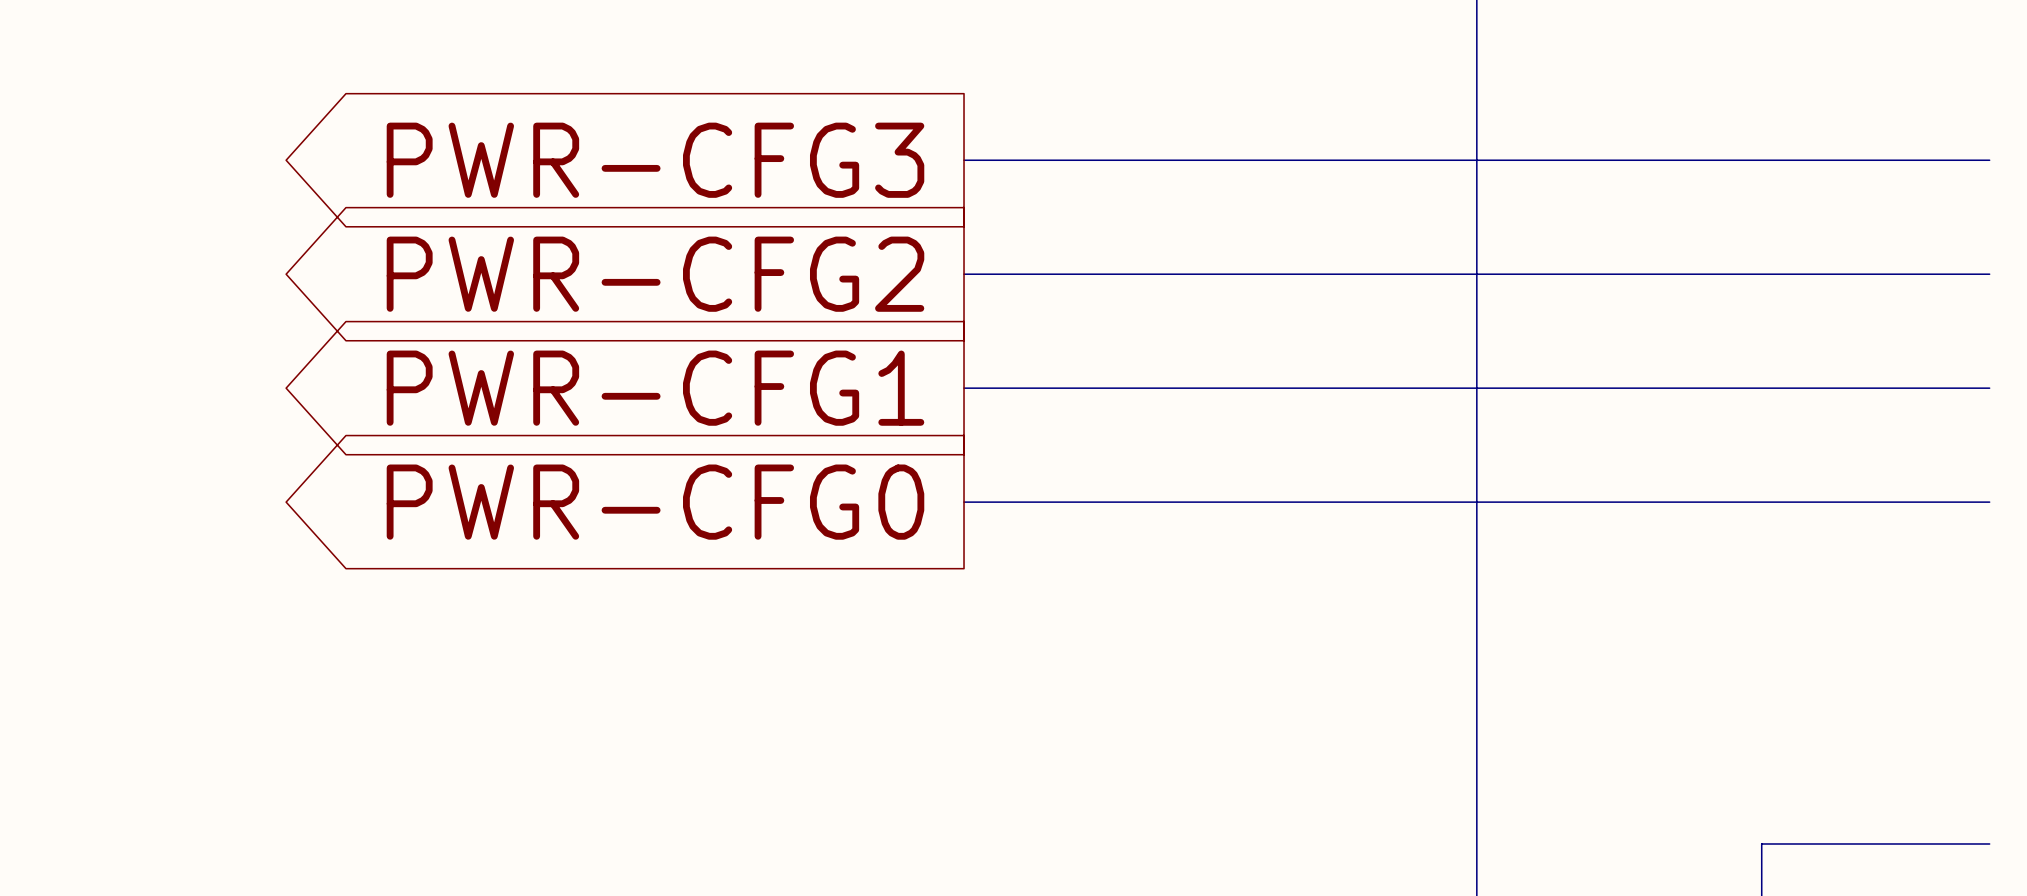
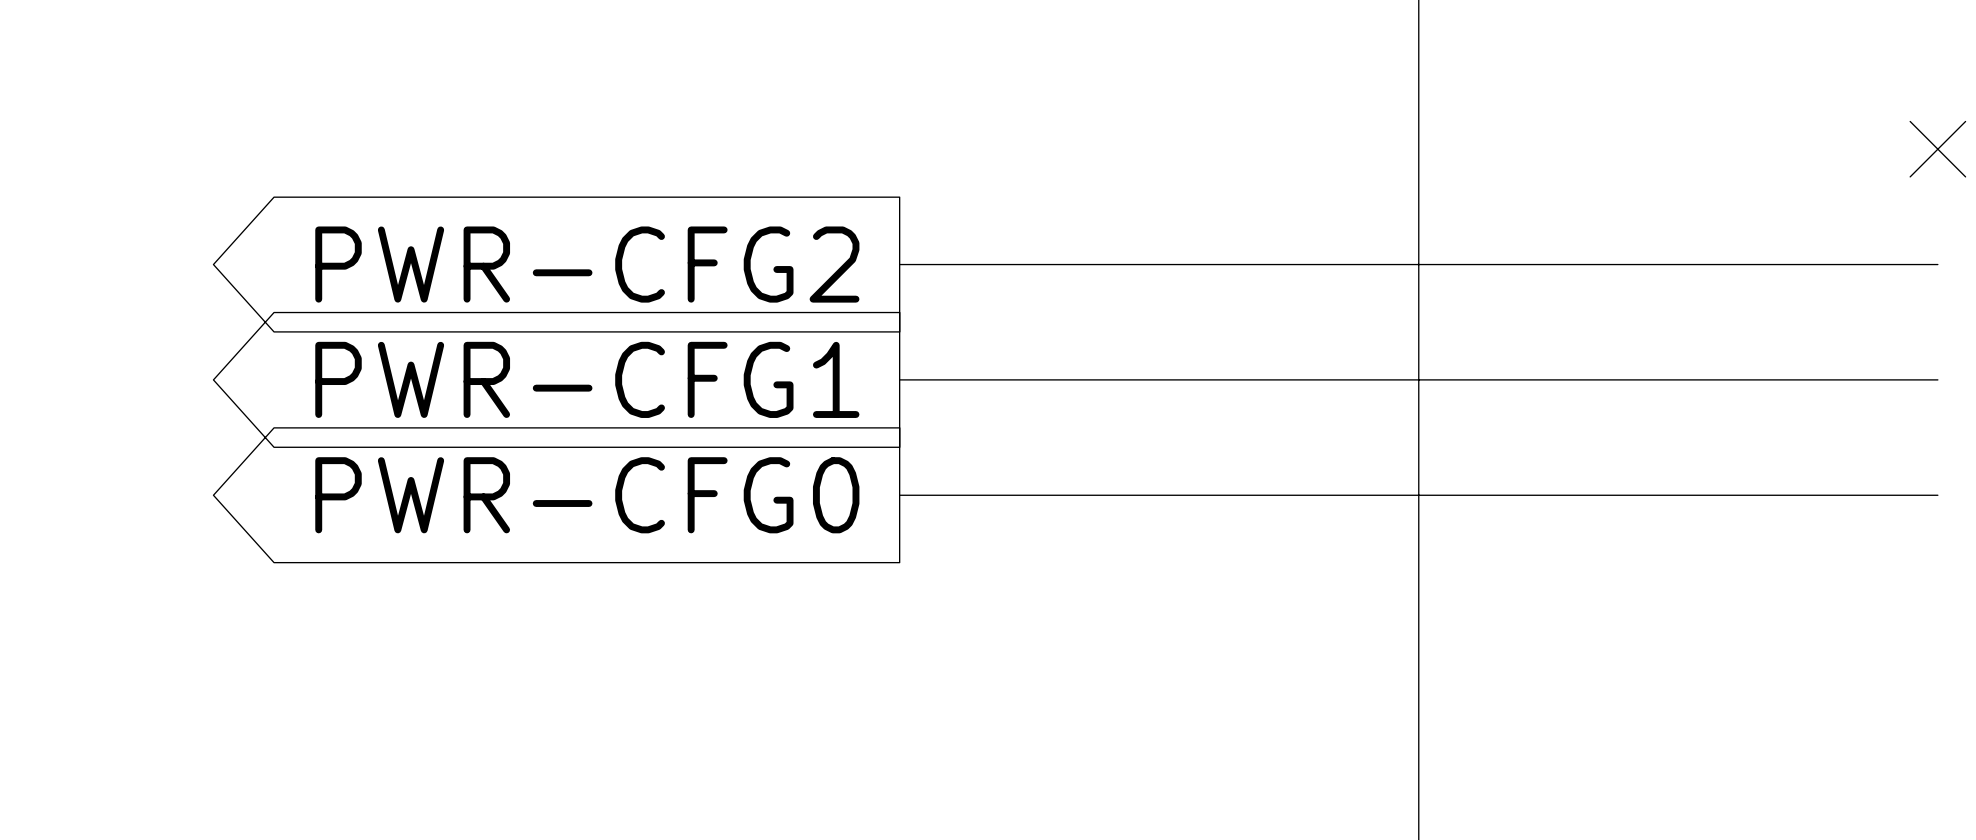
global label: PWR-CFG3 (655, 160) -> none
wire: (964, 160) (1989, 160) -> none
no-connect mark: none -> (1937, 149)

